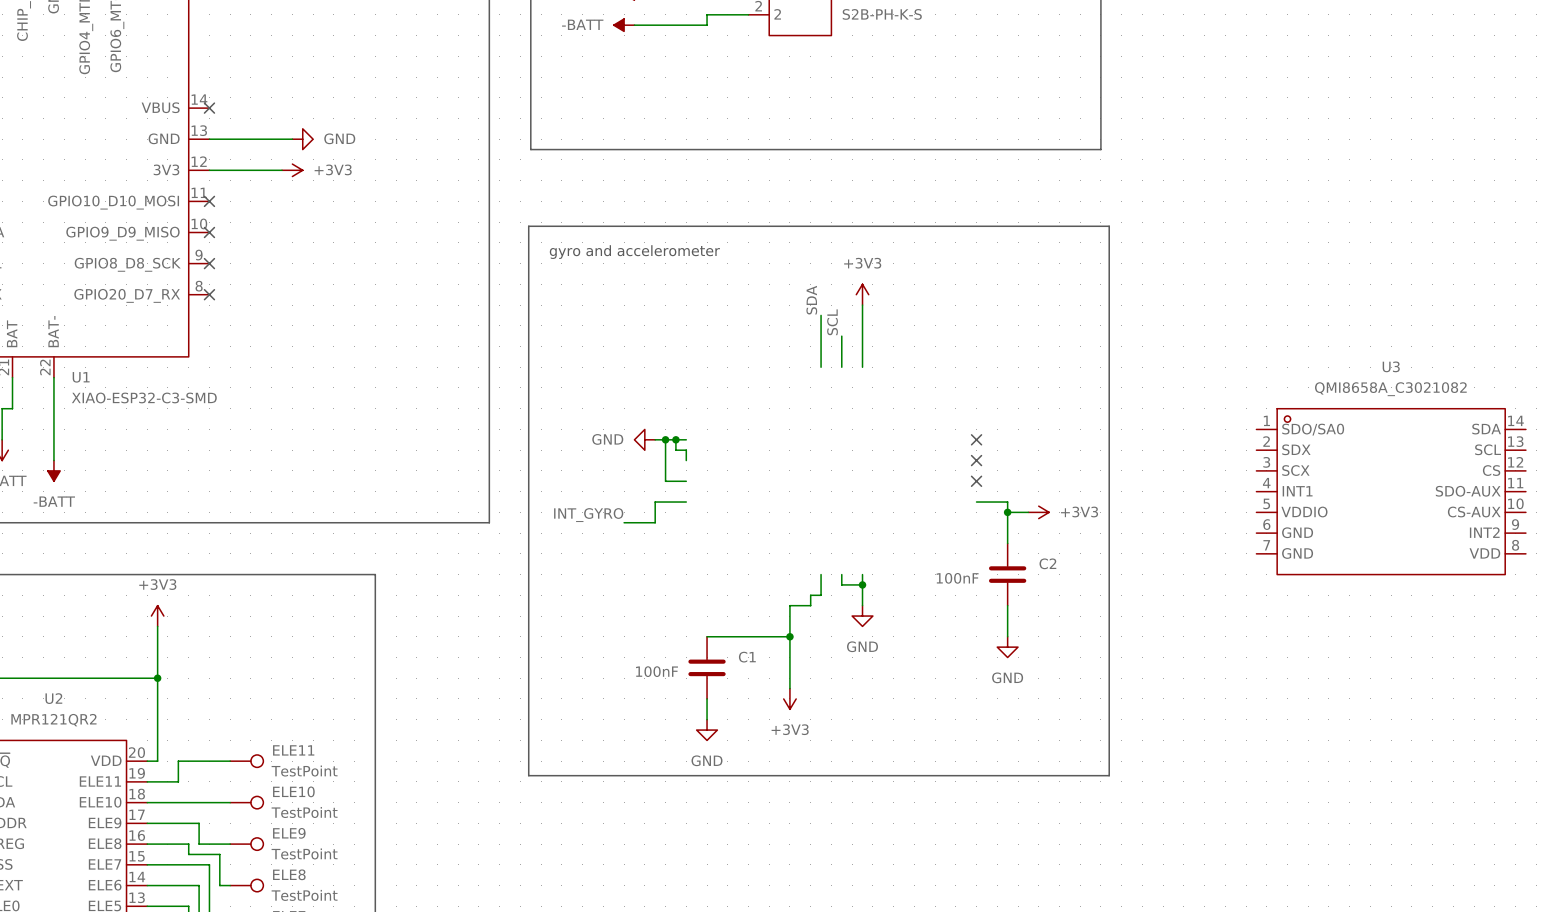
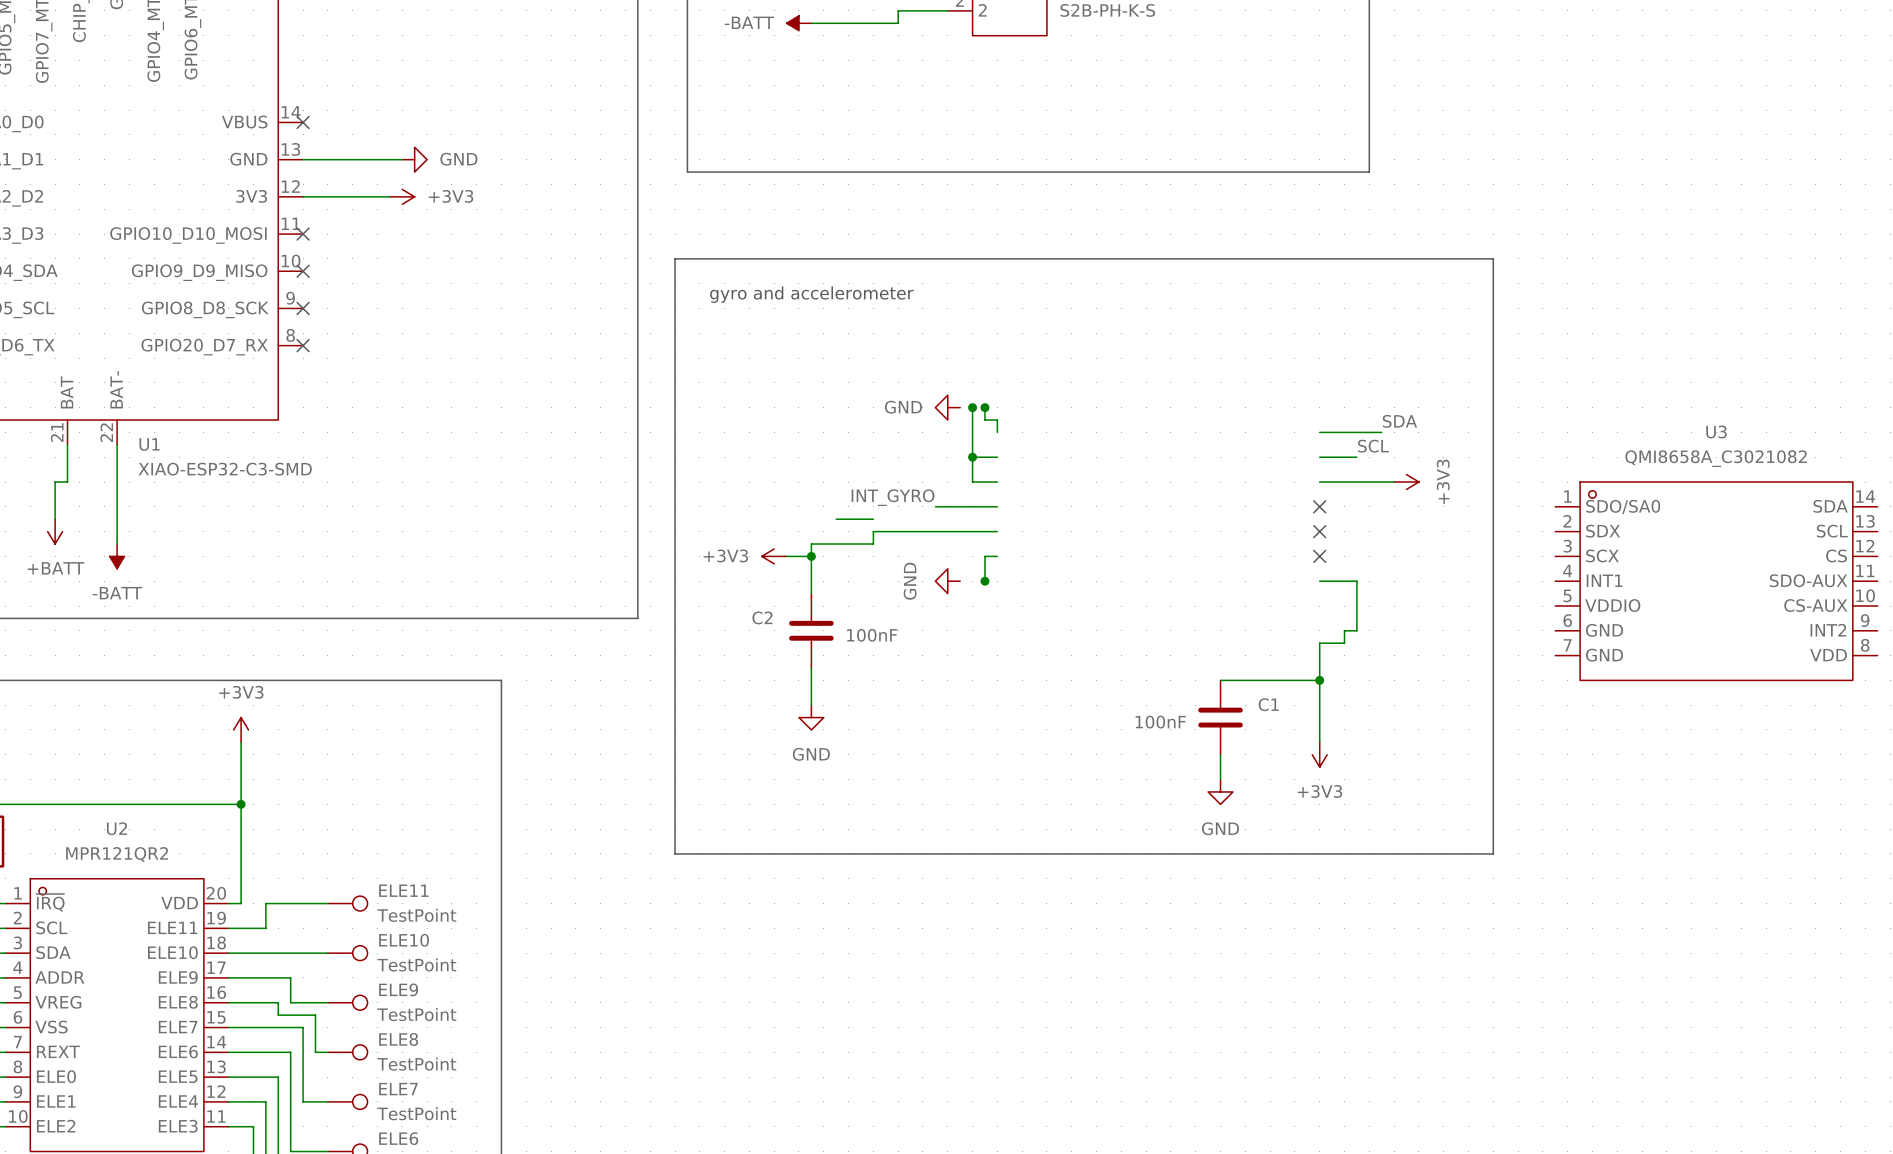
line: (528, 226) (1109, 226) (1109, 775) (528, 775) (528, 226) -> (675, 258) (675, 853) (1493, 853) (1493, 258) (675, 258)
power symbol: +3V3 (862, 294) -> none
label: SDA (811, 300) -> none
wire: (862, 305) (862, 367) -> none
wire: (821, 315) (821, 367) -> none
label: SCL (832, 322) -> none
wire: (841, 336) (841, 367) -> none
power symbol: none -> GND (947, 407)
wire: none -> (972, 407) (972, 482) (997, 482)
junction: none -> (972, 407)
wire: none -> (984, 407) (984, 420) (997, 420) (997, 432)
junction: none -> (984, 407)
label: none -> SDA (1399, 421)
wire: none -> (1319, 432) (1381, 432)
label: none -> SCL (1373, 446)
wire: none -> (972, 457) (997, 457)
junction: none -> (972, 457)
wire: none -> (1319, 457) (1356, 457)
wire: none -> (1319, 482) (1394, 482)
power symbol: none -> +3V3 (1406, 482)
wire: none -> (935, 506) (997, 506)
no-connect mark: none -> (1319, 506)
power symbol: GND (644, 439) -> none
wire: (665, 439) (665, 481) (686, 481) -> none
junction: (665, 439) -> none
wire: (675, 439) (675, 450) (686, 450) -> (997, 531) (873, 531)
junction: (675, 439) -> none
no-connect mark: (976, 439) -> none
no-connect mark: none -> (1319, 531)
wire: none -> (873, 544) (811, 544) (811, 593)
no-connect mark: (976, 460) -> none
power symbol: none -> +3V3 (774, 556)
wire: none -> (786, 556) (811, 556)
junction: none -> (811, 556)
wire: none -> (997, 556) (984, 556) (984, 581)
no-connect mark: none -> (1319, 556)
no-connect mark: (976, 481) -> none
power symbol: none -> GND (947, 581)
junction: none -> (984, 581)
wire: none -> (1319, 581) (1356, 581) (1356, 630) (1344, 630) (1344, 643) (1319, 643) (1319, 742)
wire: (686, 502) (655, 502) (655, 522) (624, 522) -> none
wire: (976, 502) (1007, 502) (1007, 543) -> none
wire: (1007, 512) (1028, 512) -> none
junction: (1007, 512) -> none
power symbol: +3V3 (1038, 512) -> none
label position: INT_GYRO (588, 515) -> INT_GYRO (893, 497)
C2 name position: C2 (1047, 563) -> C2 (762, 617)
wire: none -> (811, 667) (811, 705)
wire: (821, 574) (821, 595) (810, 595) (810, 605) (789, 605) (789, 688) -> none
wire: (841, 574) (841, 584) (862, 584) -> none
wire: (862, 574) (862, 605) -> none
wire: none -> (1220, 680) (1319, 680)
C2 position: (1007, 574) -> (811, 630)
junction: none -> (1319, 680)
C2 value position: 100nF (957, 578) -> 100nF (872, 635)
junction: (862, 584) -> none
power symbol: none -> GND (811, 717)
wire: (1007, 605) (1007, 636) -> none
power symbol: GND (862, 616) -> none
wire: (707, 636) (789, 636) -> none
junction: (789, 636) -> none
wire: none -> (1220, 754) (1220, 779)
power symbol: none -> +3V3 (1319, 754)
power symbol position: GND (1007, 647) -> GND (1220, 791)
C1 position: (707, 667) -> (1220, 717)
wire: (707, 698) (707, 719) -> none
power symbol: +3V3 (789, 698) -> none
power symbol: GND (707, 730) -> none

